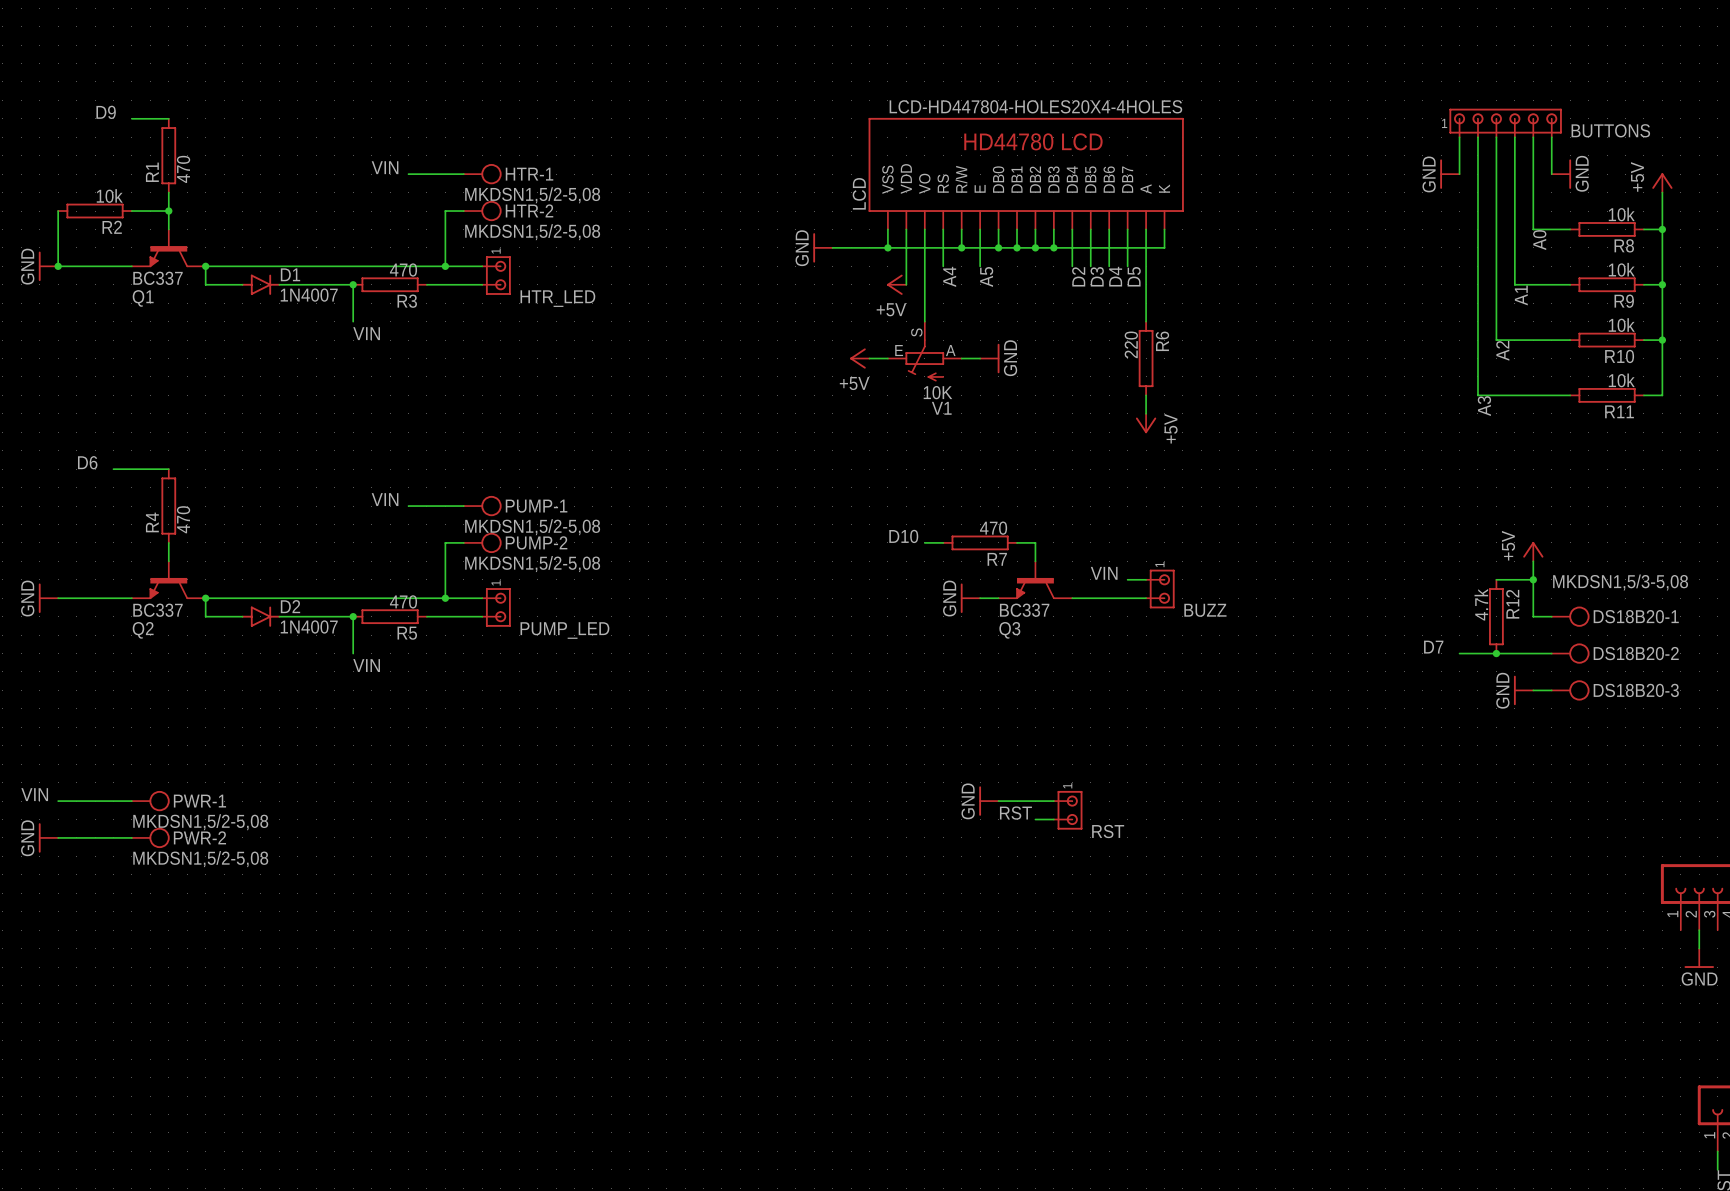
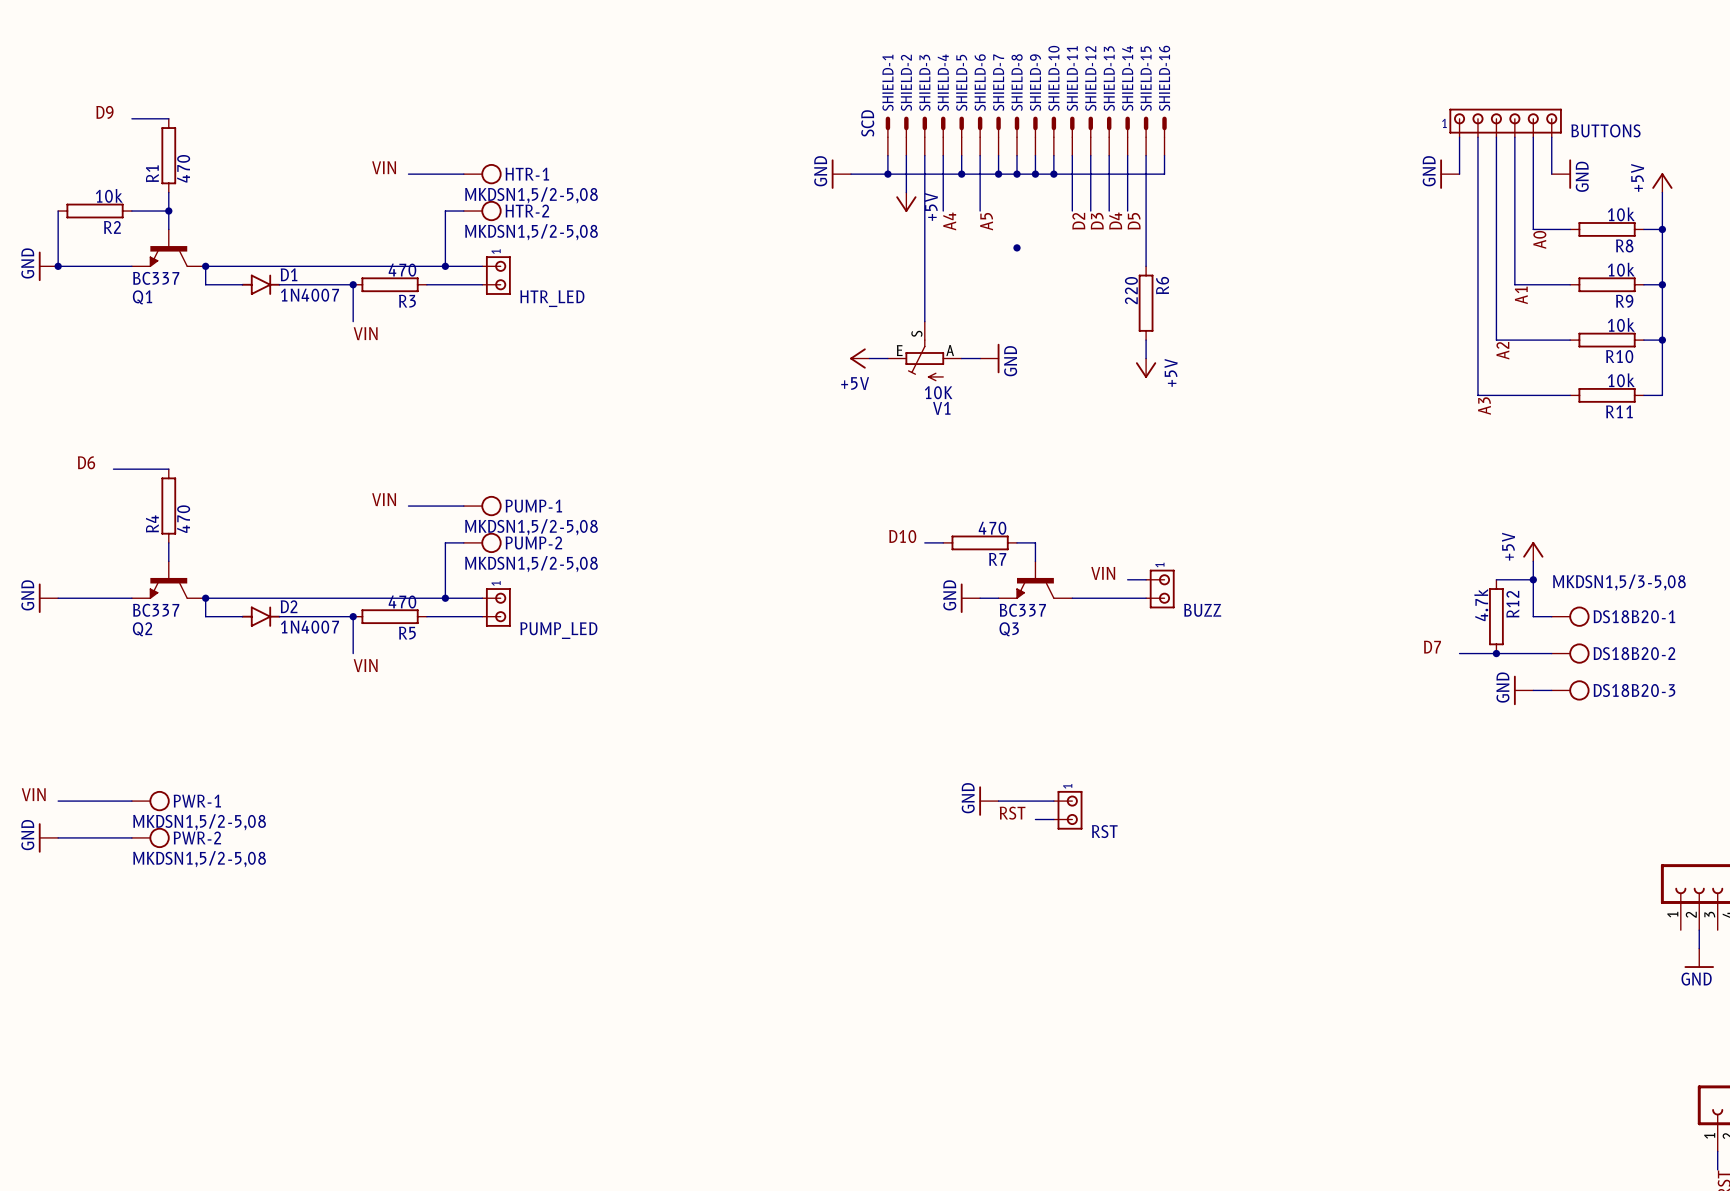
SHIELD-1: none -> SCD (887, 136)
SHIELD-2: none -> (906, 136)
SHIELD-3: none -> (924, 136)
SHIELD-4: none -> (943, 136)
SHIELD-5: none -> (961, 136)
SHIELD-6: none -> (980, 136)
SHIELD-7: none -> (998, 136)
SHIELD-8: none -> (1017, 136)
SHIELD-9: none -> (1035, 136)
SHIELD-10: none -> (1053, 136)
SHIELD-11: none -> (1072, 136)
SHIELD-12: none -> (1090, 136)
SHIELD-13: none -> (1109, 136)
SHIELD-14: none -> (1127, 136)
SHIELD-15: none -> (1146, 136)
SHIELD-16: none -> (1164, 136)
wire: none -> (924, 155) (924, 229)
wire: none -> (980, 155) (980, 211)
wire: none -> (1072, 155) (1072, 211)
wire: none -> (1090, 155) (1090, 211)
wire: none -> (1109, 155) (1109, 211)
wire: none -> (1146, 155) (1146, 229)
wire: none -> (1164, 155) (1164, 174) (851, 174)
LCD: LCD-HD447804-HOLES20X4-4HOLES (1026, 173) -> none
junction: none -> (887, 174)
junction: none -> (961, 174)
junction: none -> (998, 174)
junction: none -> (1017, 174)
junction: none -> (1035, 174)
junction: none -> (1053, 174)
wire: (887, 229) (887, 247) -> (887, 155) (887, 174)
wire: (906, 229) (906, 284) -> (943, 155) (943, 211)
wire: (943, 229) (943, 266) -> (906, 155) (906, 192)
wire: (961, 229) (961, 247) -> (961, 155) (961, 174)
wire: (980, 229) (980, 266) -> none
wire: (998, 229) (998, 247) -> (998, 155) (998, 174)
wire: (1017, 229) (1017, 247) -> (1017, 155) (1017, 174)
wire: (1035, 229) (1035, 247) -> (1035, 155) (1035, 174)
wire: (1053, 229) (1053, 247) -> (1053, 155) (1053, 174)
wire: (1072, 229) (1072, 266) -> none
wire: (1090, 229) (1090, 266) -> none
wire: (1109, 229) (1109, 266) -> none
wire: (1127, 229) (1127, 266) -> none
wire: (1164, 229) (1164, 247) (832, 247) -> none
power symbol position: GND (822, 247) -> GND (841, 174)
junction: (887, 247) -> none
junction: (961, 247) -> none
junction: (998, 247) -> none
junction: (1035, 247) -> none
junction: (1053, 247) -> none
wire: (1146, 266) (1146, 321) -> (1127, 155) (1127, 211)
label position: A4 (949, 276) -> A4 (949, 221)
label position: A5 (986, 276) -> A5 (986, 221)
label position: D2 (1078, 276) -> D2 (1078, 221)
label position: D3 (1097, 276) -> D3 (1097, 221)
label position: D4 (1115, 276) -> D4 (1115, 221)
label position: D5 (1134, 276) -> D5 (1134, 221)
power symbol rotation: 0° (894, 284) -> 90° counterclockwise (906, 204)
power symbol position: +5V (896, 284) -> +5V (906, 202)
R6 position: (1146, 358) -> (1146, 303)
wire: (1146, 395) (1146, 413) -> (1146, 340) (1146, 358)
power symbol position: +5V (1146, 423) -> +5V (1146, 368)

